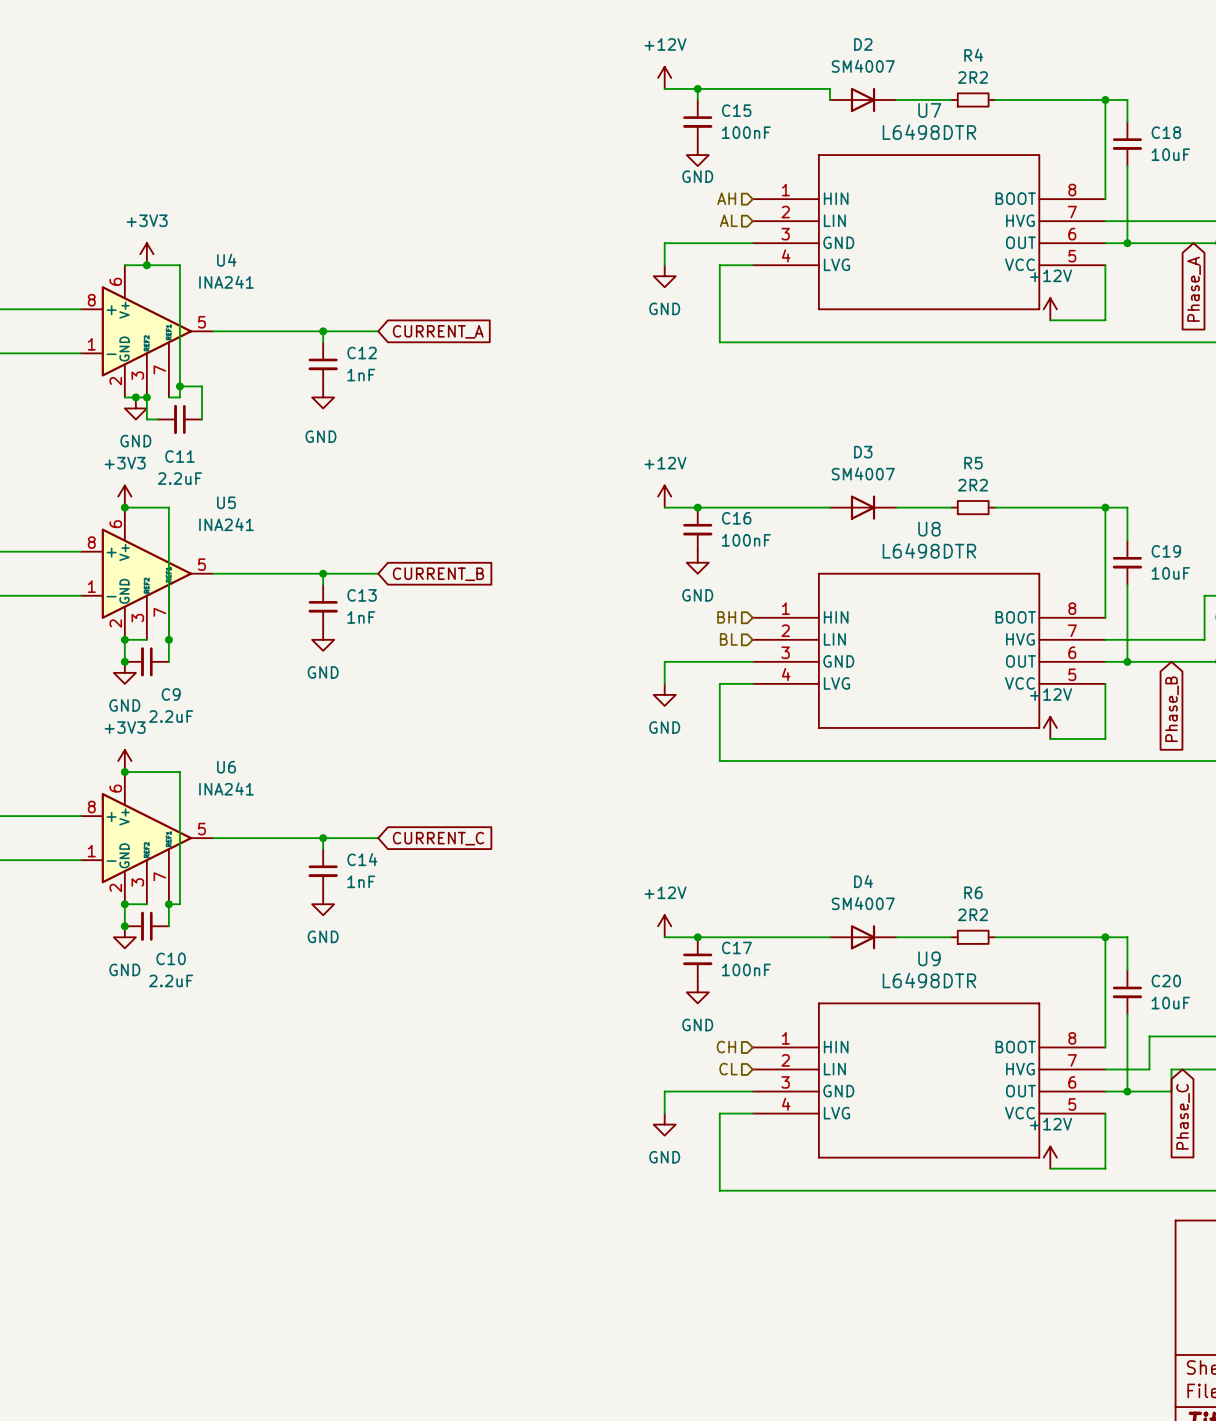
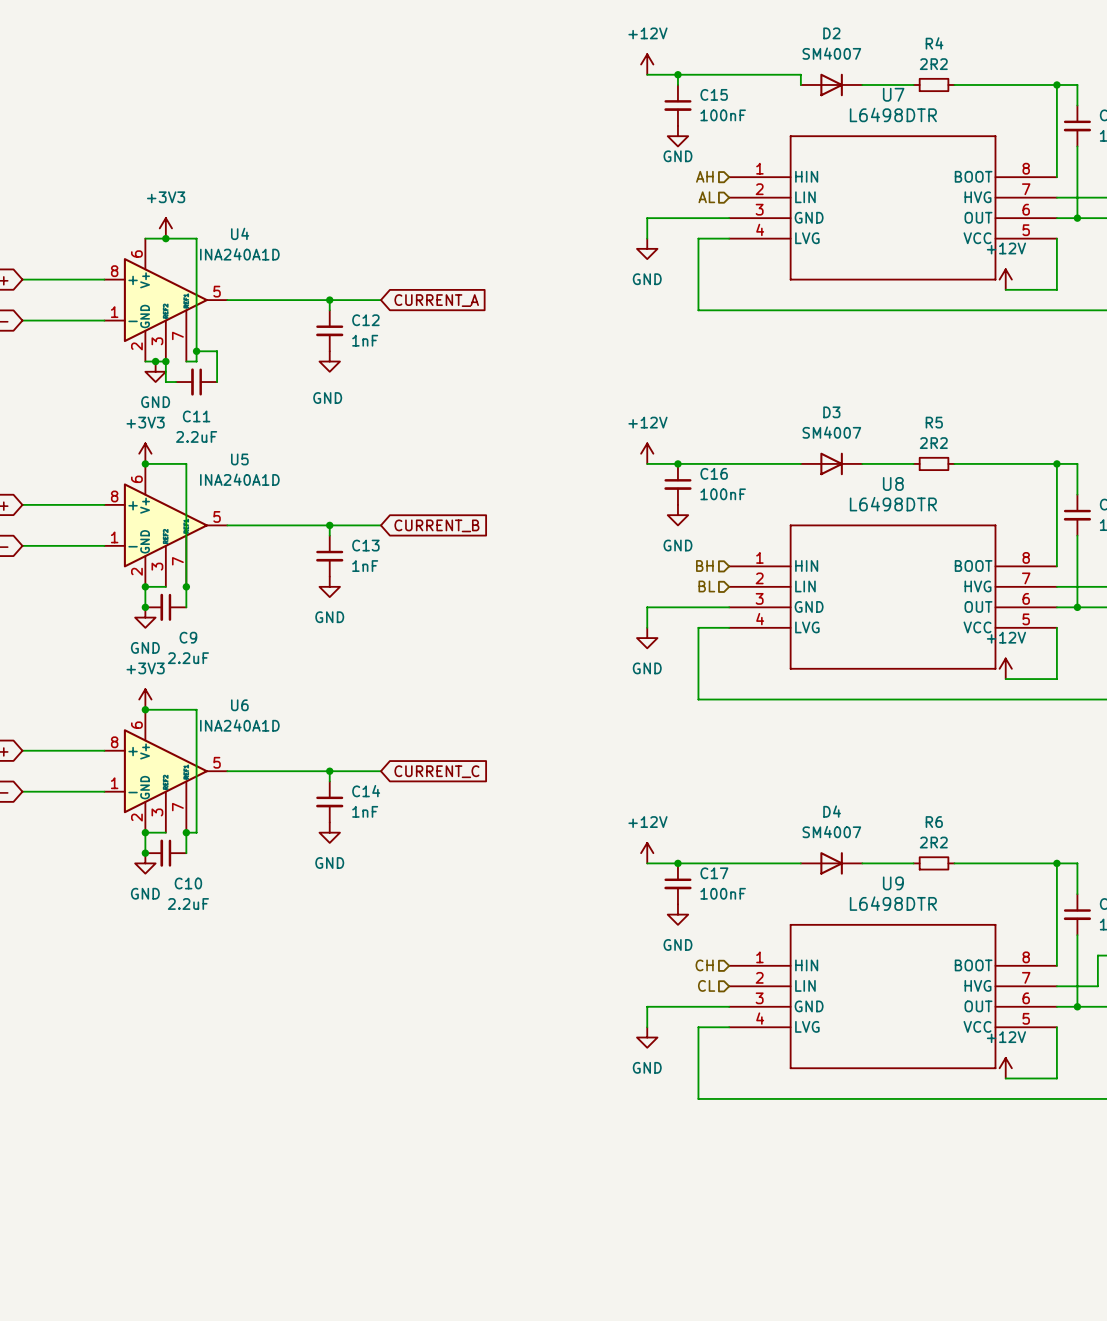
U4 value: INA241 (226, 282) -> INA240A1D (239, 254)
U5 value: INA241 (226, 524) -> INA240A1D (239, 479)
U6 value: INA241 (226, 788) -> INA240A1D (239, 725)

